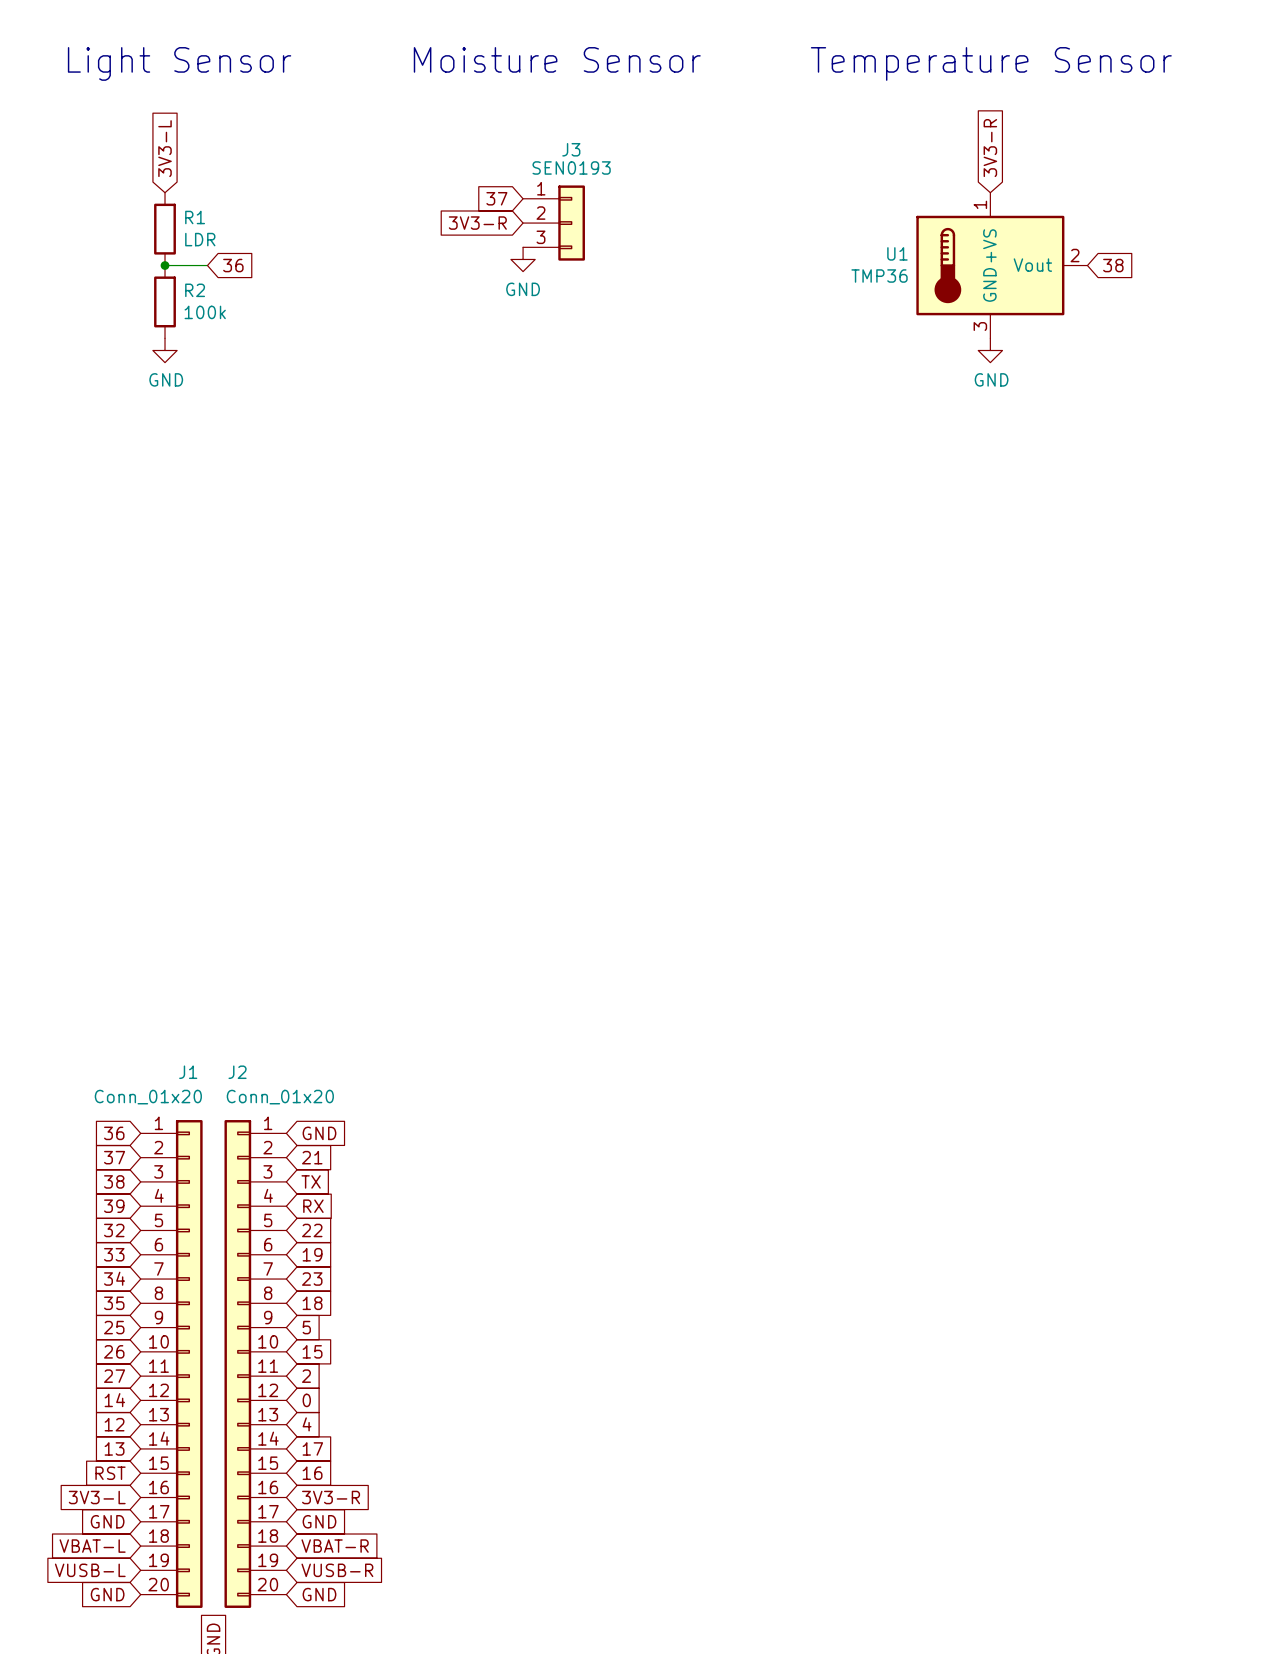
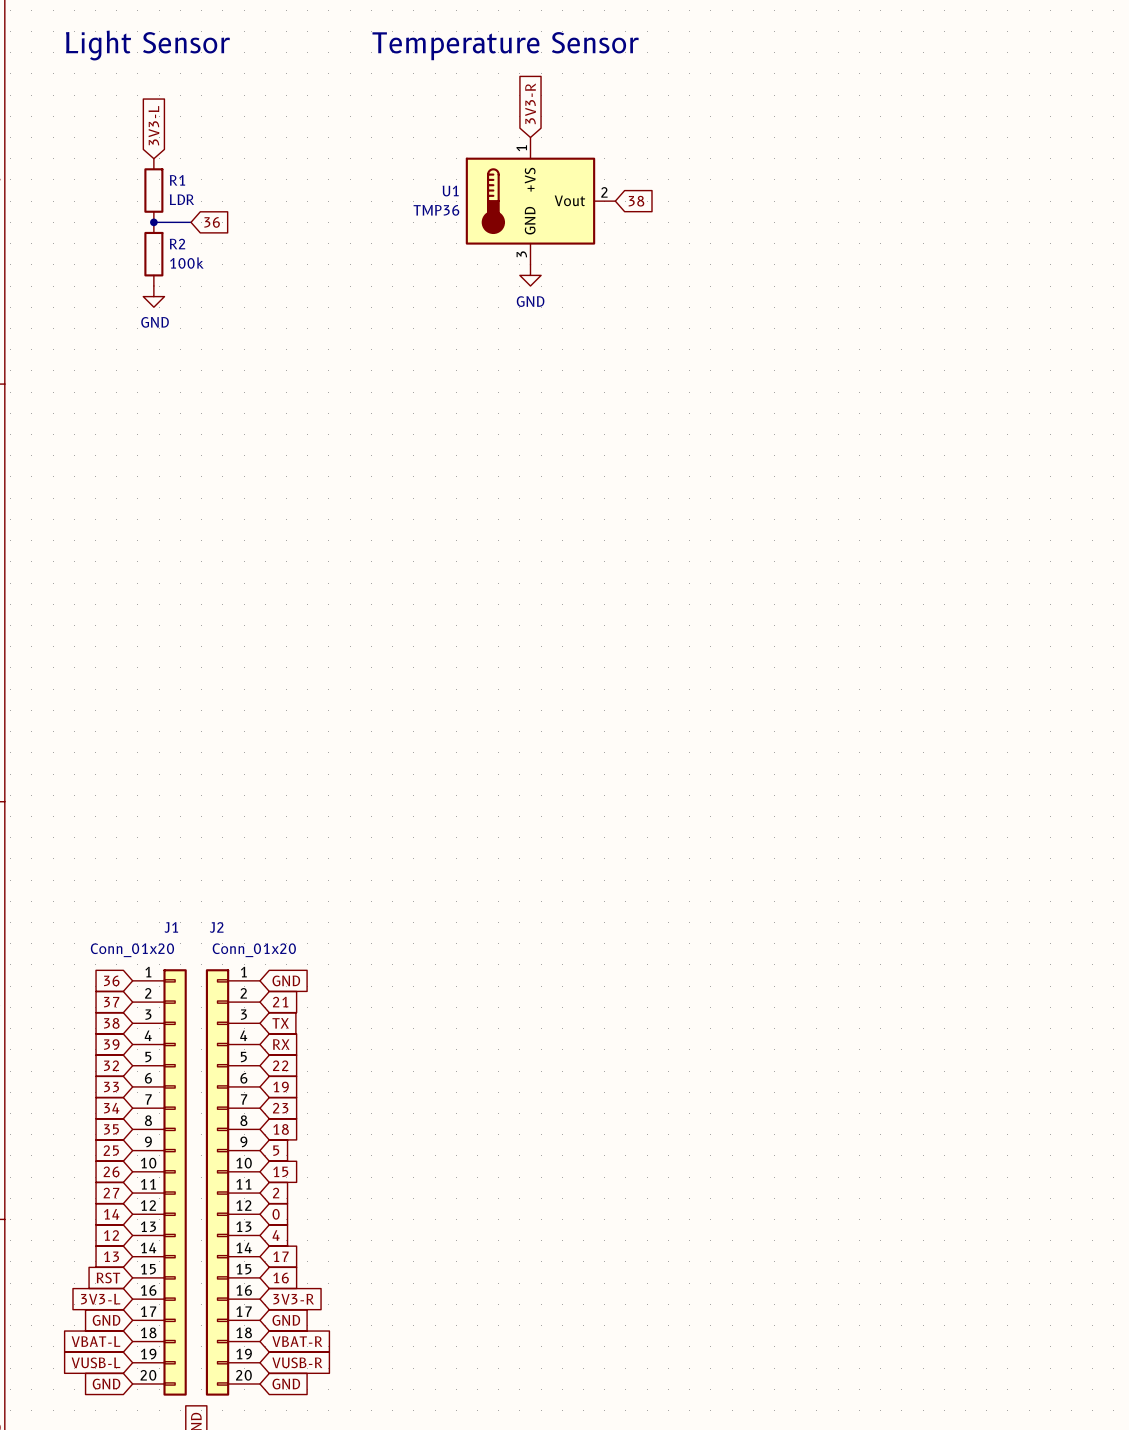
text: Moisture Sensor (557, 59) -> Temperature Sensor (505, 46)
text: Temperature Sensor (991, 63) -> none
global label: 3V3-R (990, 148) -> none
global label: 37 (496, 198) -> none
global label rotation: 0° (477, 223) -> 90° clockwise (530, 103)
global label position: 3V3-R (477, 223) -> 3V3-R (530, 103)
J3: SEN0193 (554, 223) -> none
global label: none -> 38 (636, 201)
power symbol position: GND (523, 259) -> GND (530, 275)
U1 position: (1001, 265) -> (540, 201)
global label: 38 (1113, 265) -> none
power symbol: GND (990, 350) -> none

